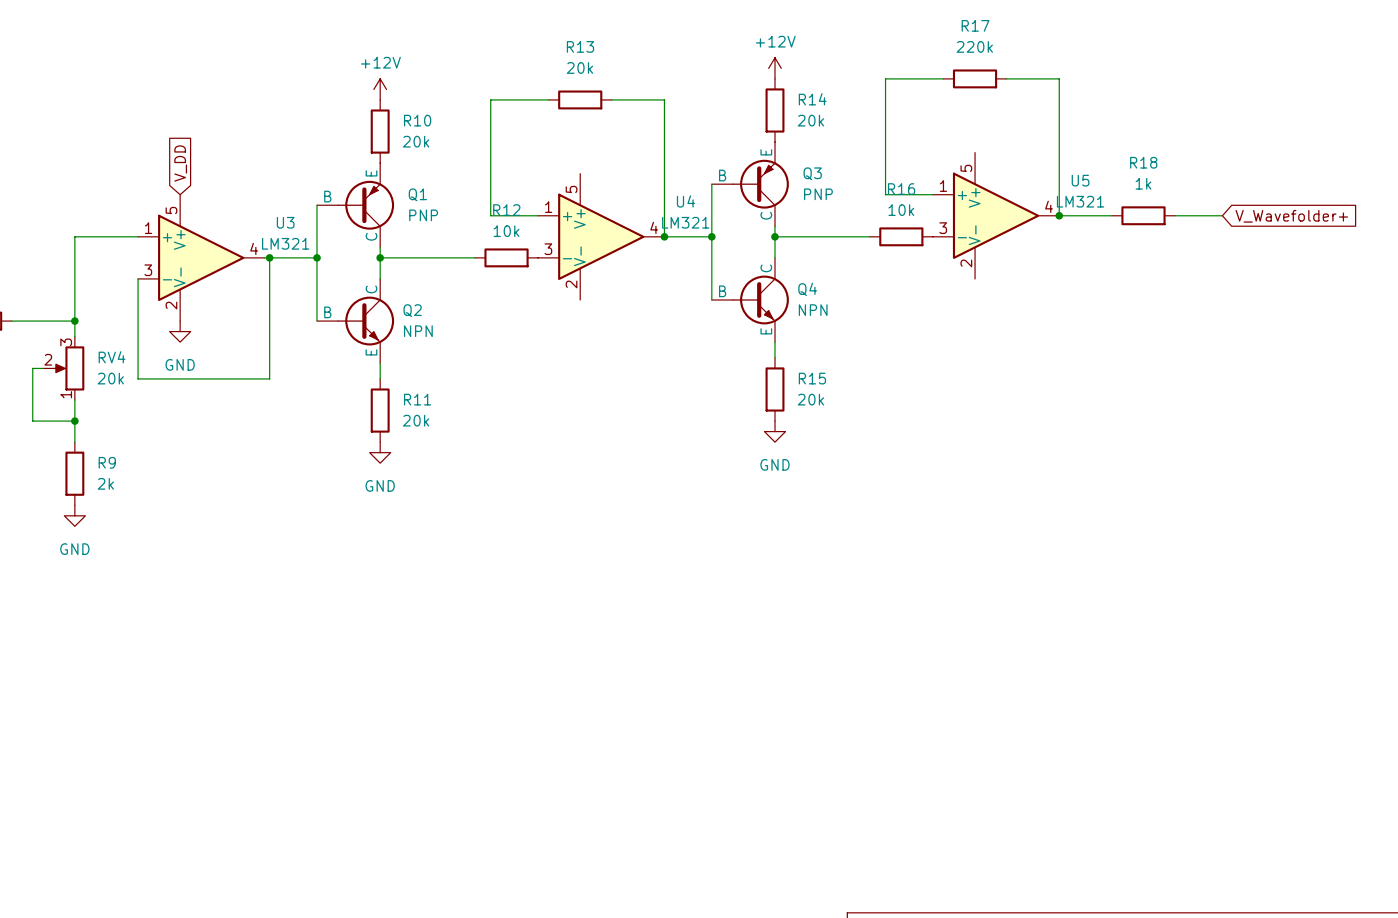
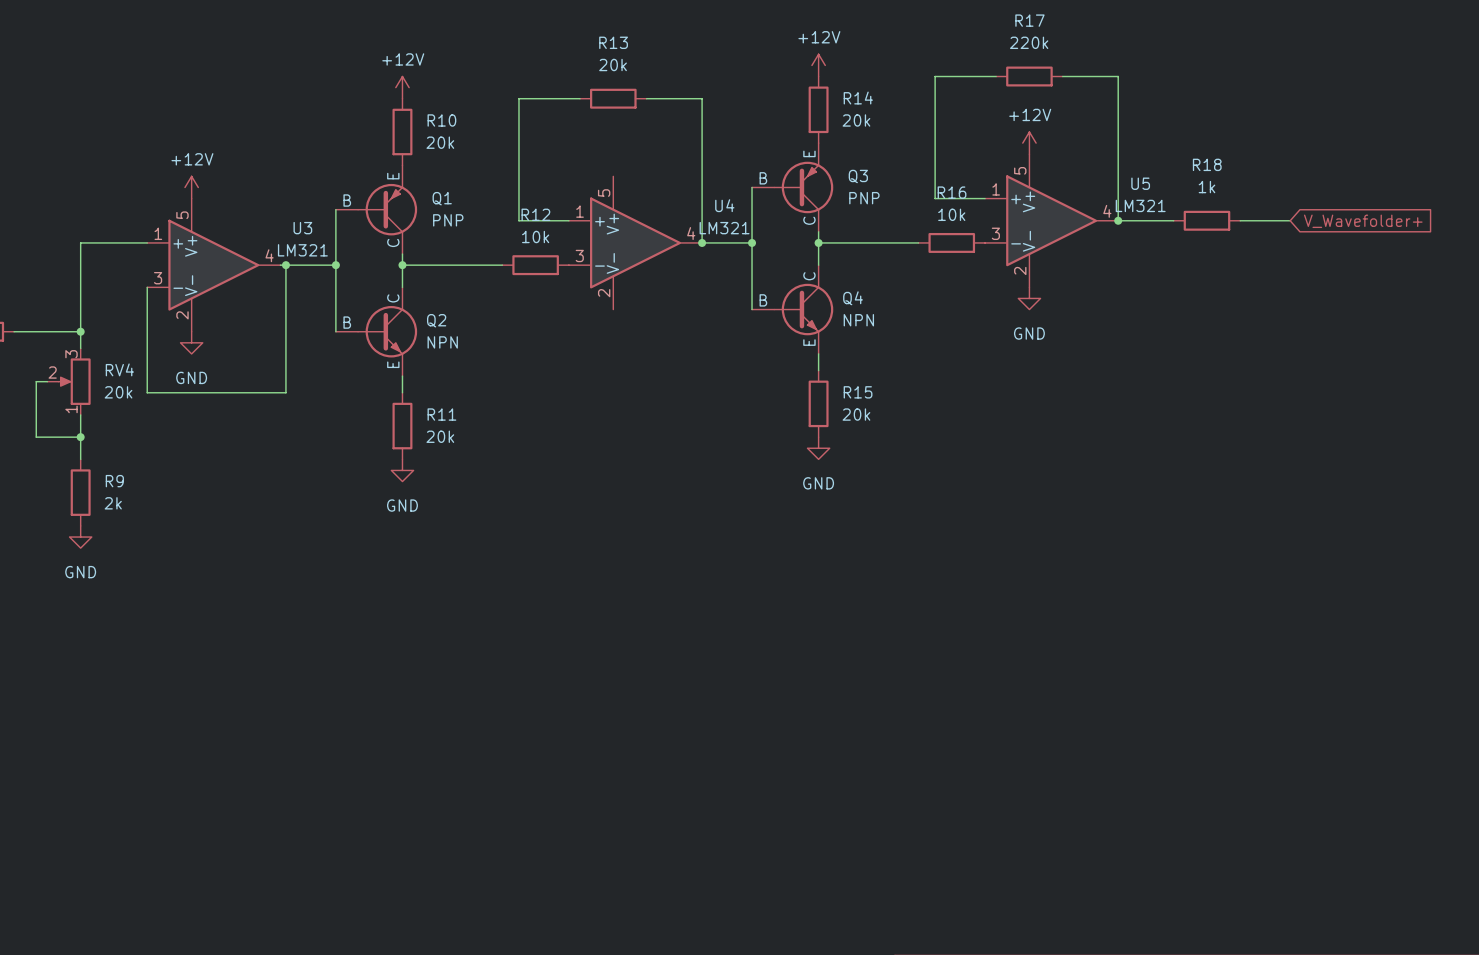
power symbol: none -> +12V (1029, 143)
global label: V_DD (180, 163) -> none
power symbol: none -> +12V (191, 187)
power symbol: none -> GND (1029, 298)

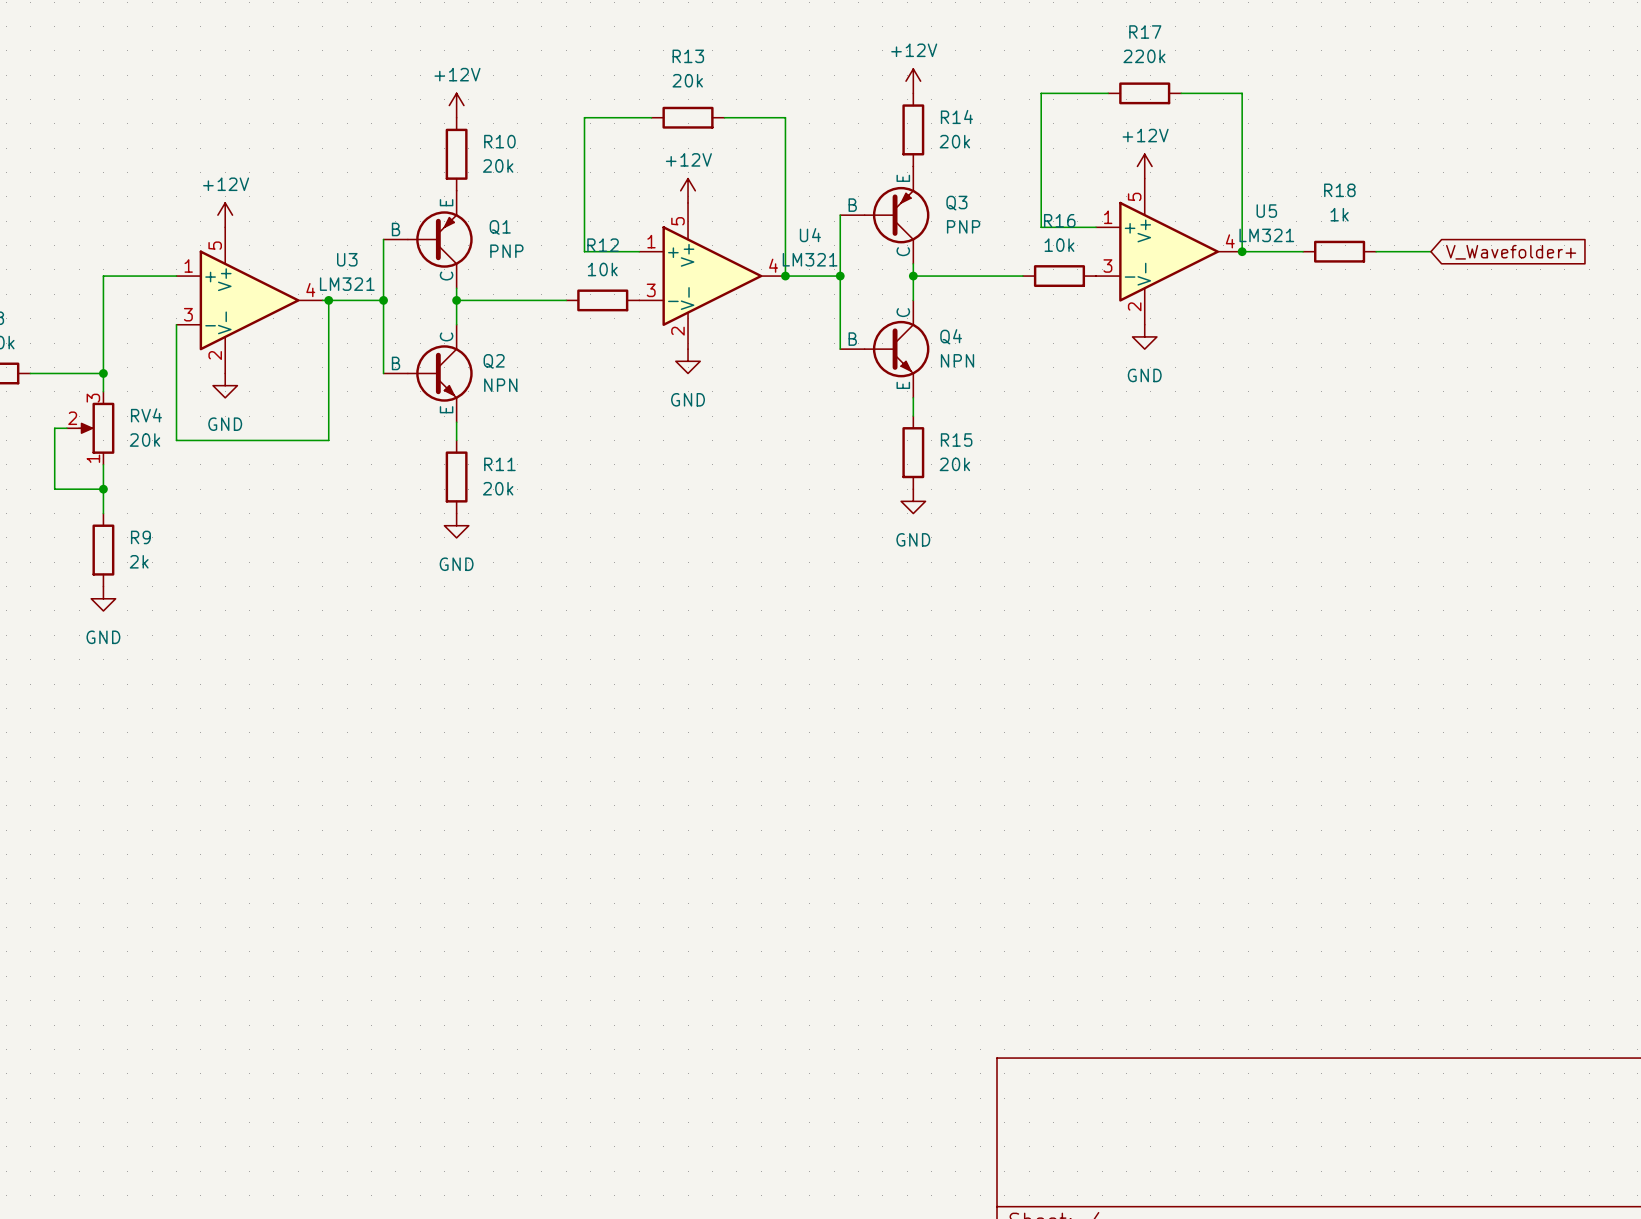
power symbol: none -> +12V (688, 190)
power symbol: none -> GND (688, 361)

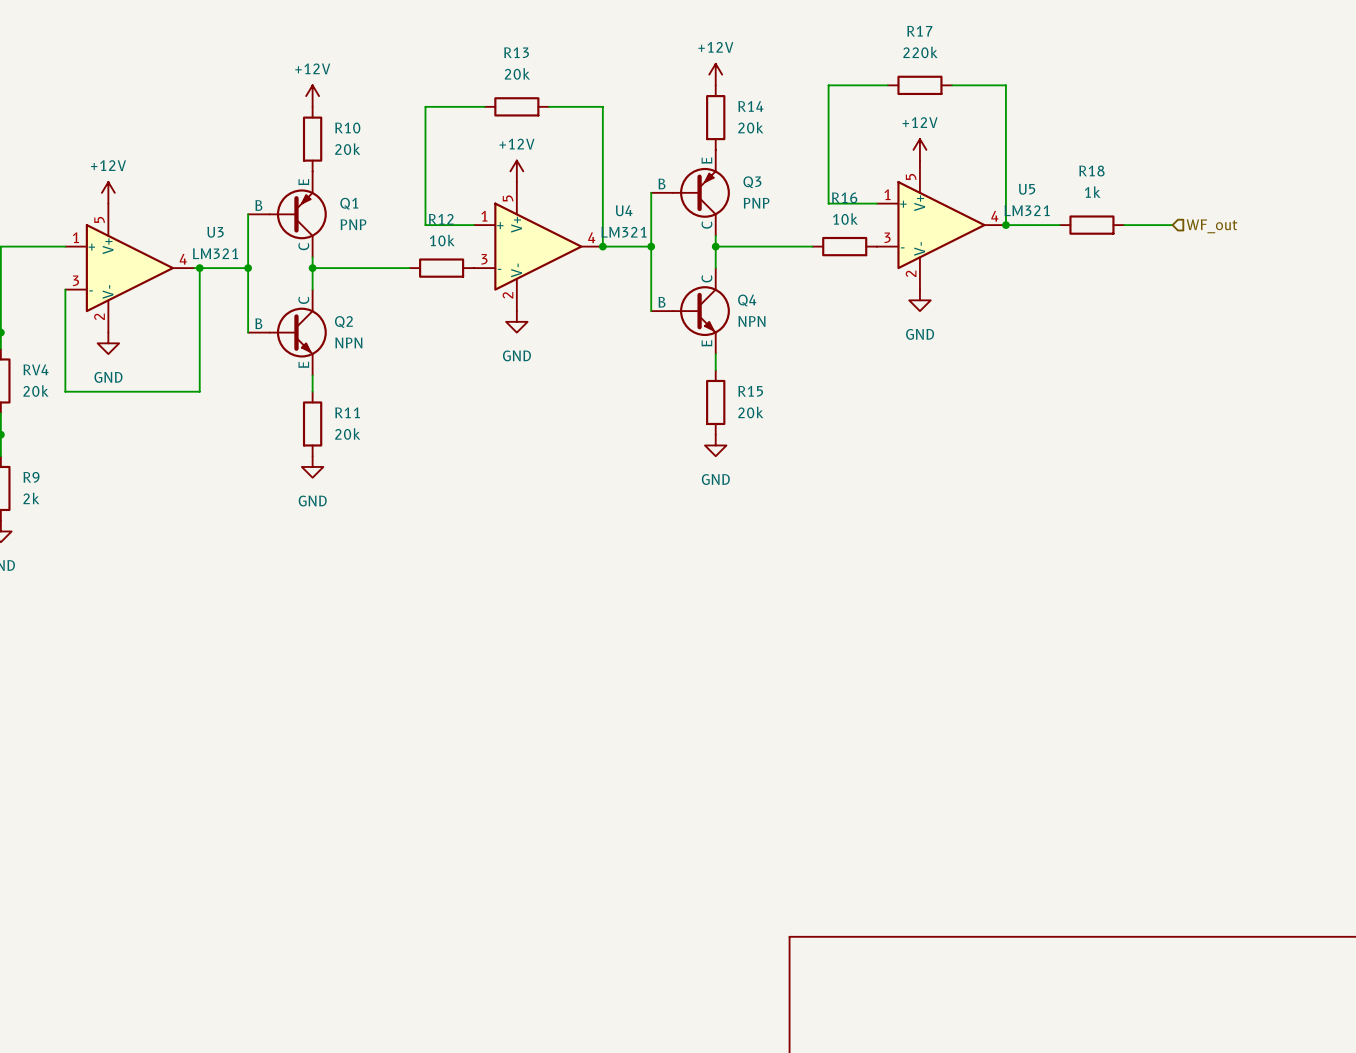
hierarchical label: none -> WF_out (1212, 226)
global label: V_Wavefolder+ (1511, 252) -> none

